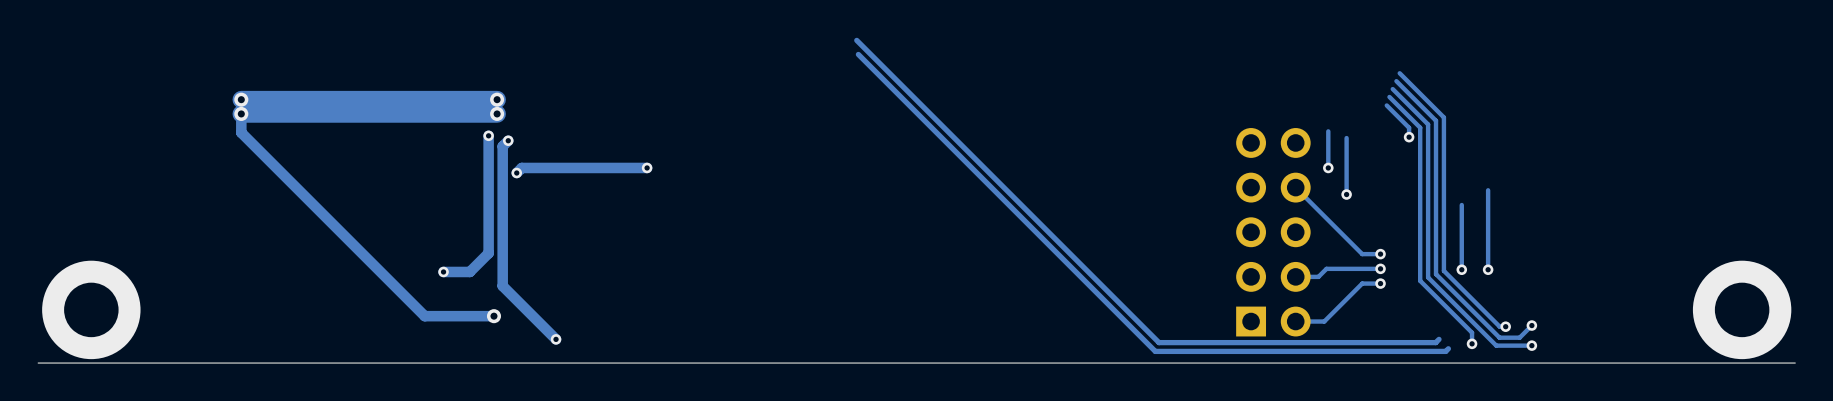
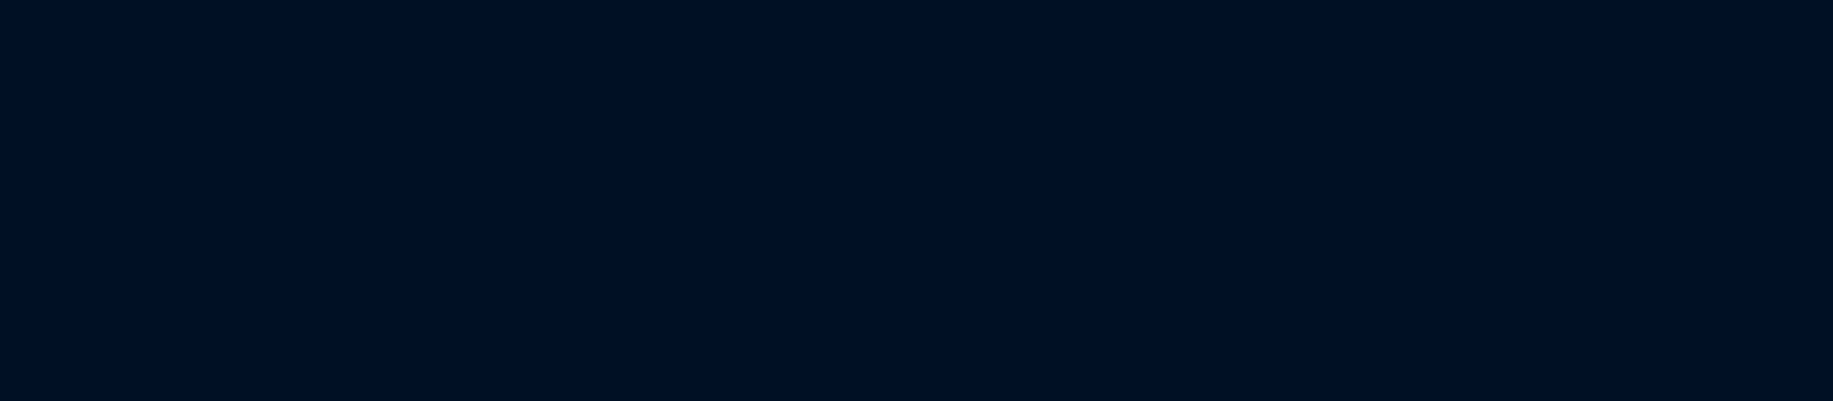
track: (856, 40) (1158, 342) (1435, 342) (1439, 339) -> none
track: (858, 54) (1155, 351) (1445, 351) (1448, 348) -> none
track: (1399, 73) (1443, 117) (1443, 270) (1499, 326) (1505, 326) -> none
track: (1396, 81) (1436, 120) (1436, 274) (1499, 337) (1519, 337) (1531, 325) -> none
track: (1392, 89) (1428, 124) (1428, 277) (1496, 345) (1531, 345) -> none
track: (1389, 96) (1420, 127) (1420, 280) (1472, 332) (1472, 340) -> none
via: (241, 99) -> none
track: (497, 99) (241, 99) -> none
via: (497, 99) -> none
track: (1386, 105) (1409, 127) (1409, 137) -> none
via: (241, 113) -> none
track: (497, 113) (241, 113) (241, 132) (424, 316) (493, 316) -> none
via: (497, 113) -> none
track: (1328, 131) (1328, 167) -> none
track: (488, 135) (488, 253) (469, 271) (443, 271) -> none
via: (488, 135) -> none
via: (1409, 137) -> none
track: (1346, 138) (1346, 194) -> none
track: (508, 140) (502, 146) (502, 286) (556, 339) -> none
via: (508, 140) -> none
track: (647, 167) (521, 167) (516, 173) -> none
via: (647, 167) -> none
via: (1328, 167) -> none
via: (516, 173) -> none
track: (1295, 187) (1362, 254) (1380, 254) -> none
track: (1488, 190) (1488, 269) -> none
via: (1346, 194) -> none
track: (1461, 205) (1461, 269) -> none
part: (1273, 232) -> none
via: (1380, 254) -> none
track: (1380, 268) (1326, 268) (1318, 276) (1295, 276) -> none
via: (1380, 268) -> none
via: (1461, 269) -> none
via: (1488, 269) -> none
via: (443, 271) -> none
track: (1380, 283) (1362, 283) (1324, 321) (1295, 321) -> none
via: (1380, 283) -> none
via: (91, 309) -> none
via: (1742, 309) -> none
via: (493, 316) -> none
via: (1531, 325) -> none
via: (1505, 326) -> none
via: (556, 339) -> none
via: (1472, 343) -> none
via: (1531, 345) -> none
board edge: (1795, 363) (38, 363) -> none

